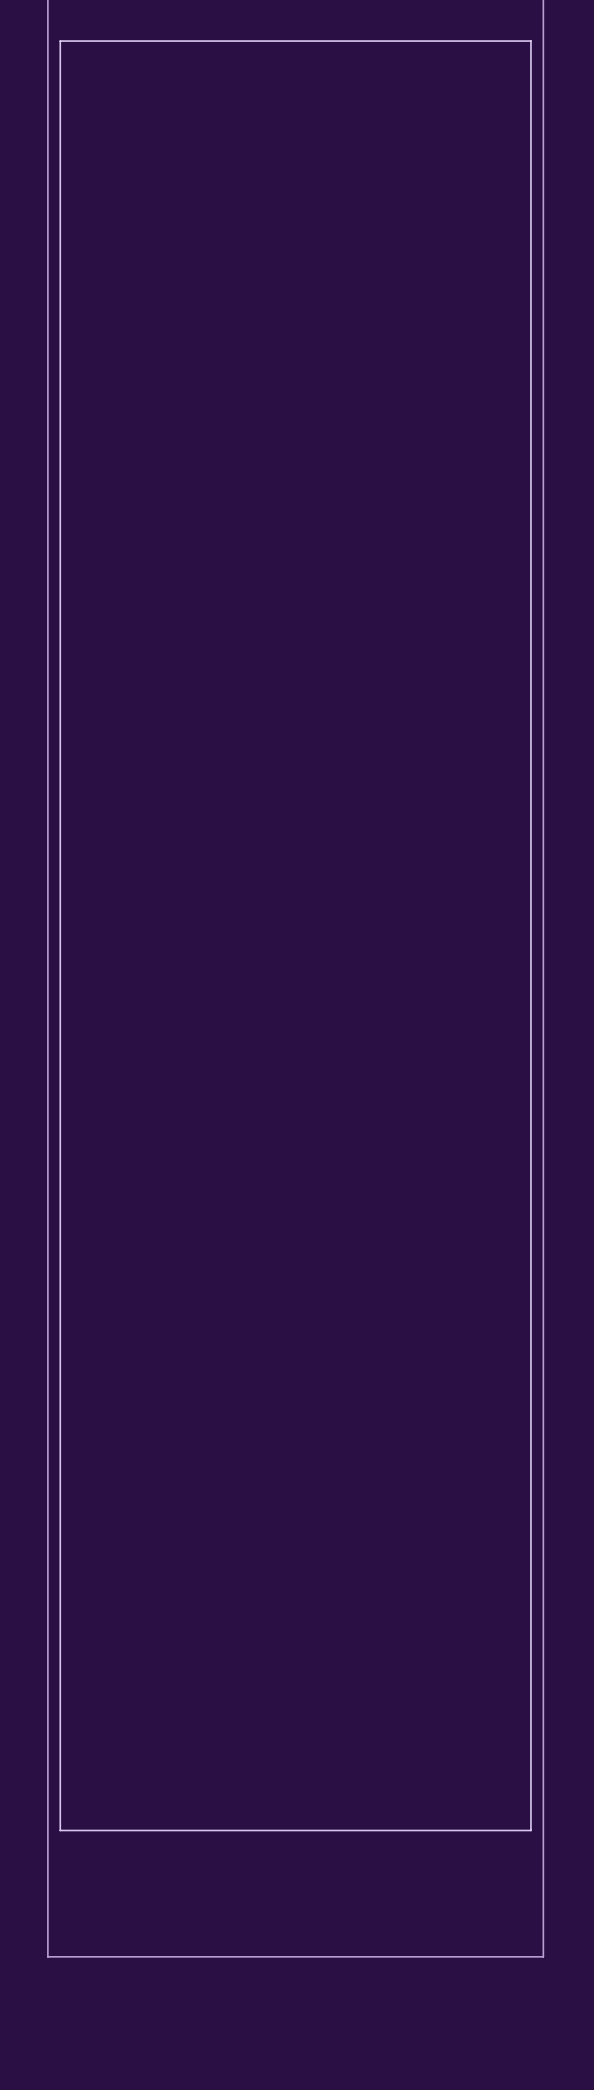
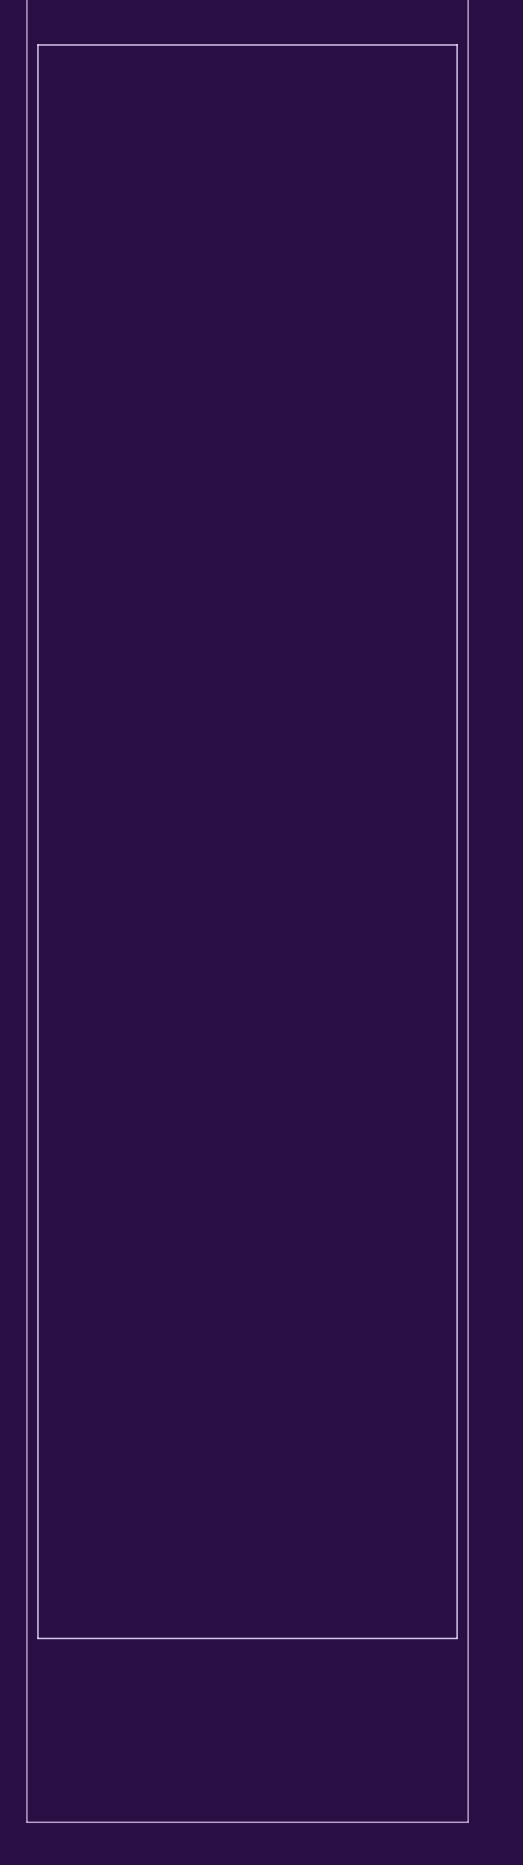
line: (47, 1956) (543, 1956) -> (26, 1750) (26, 1822) (468, 1822) (468, 1750)

